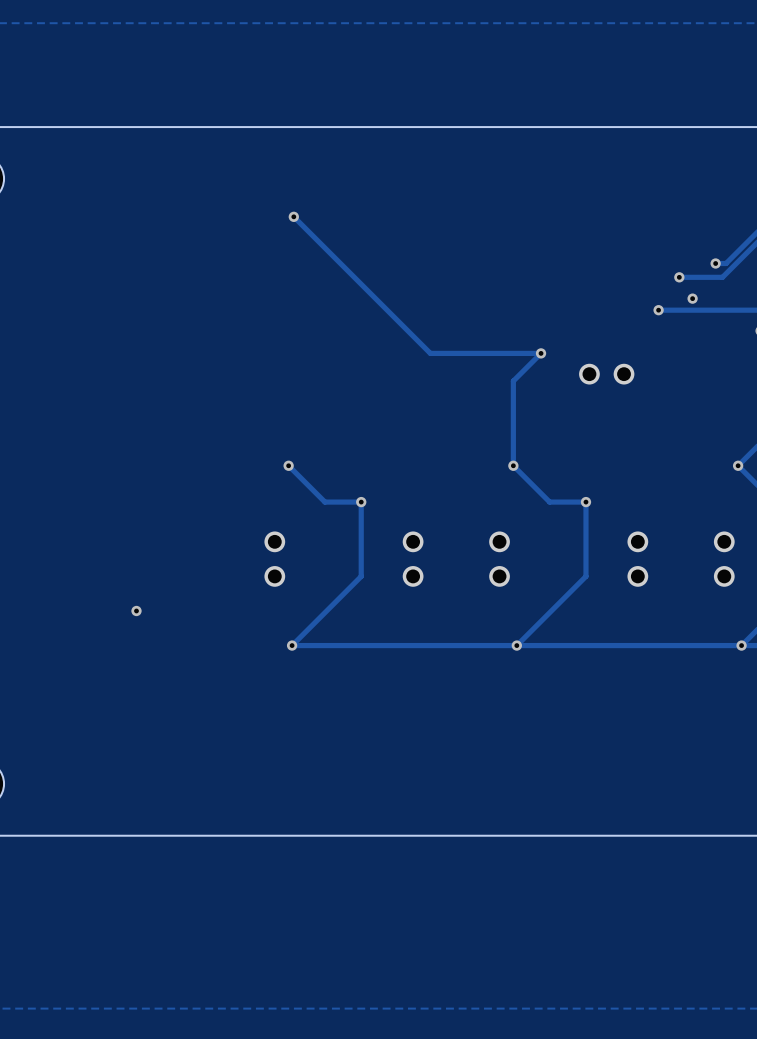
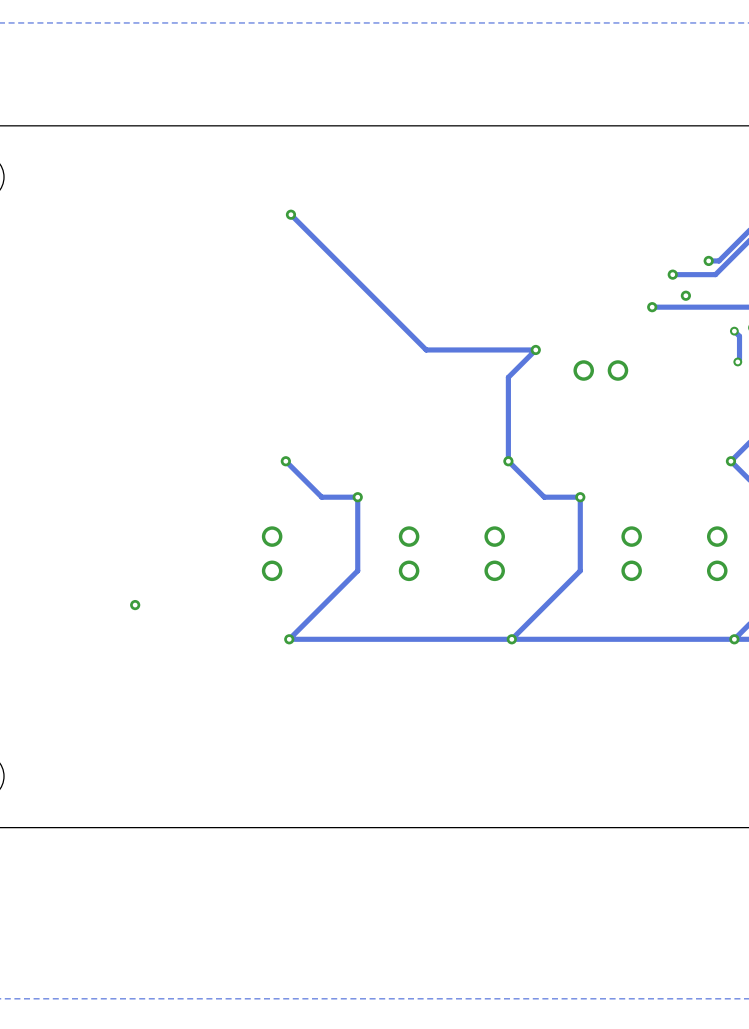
track: none -> (734, 331) (739, 336) (739, 360) (737, 361)
via: none -> (734, 331)
via: none -> (737, 361)

